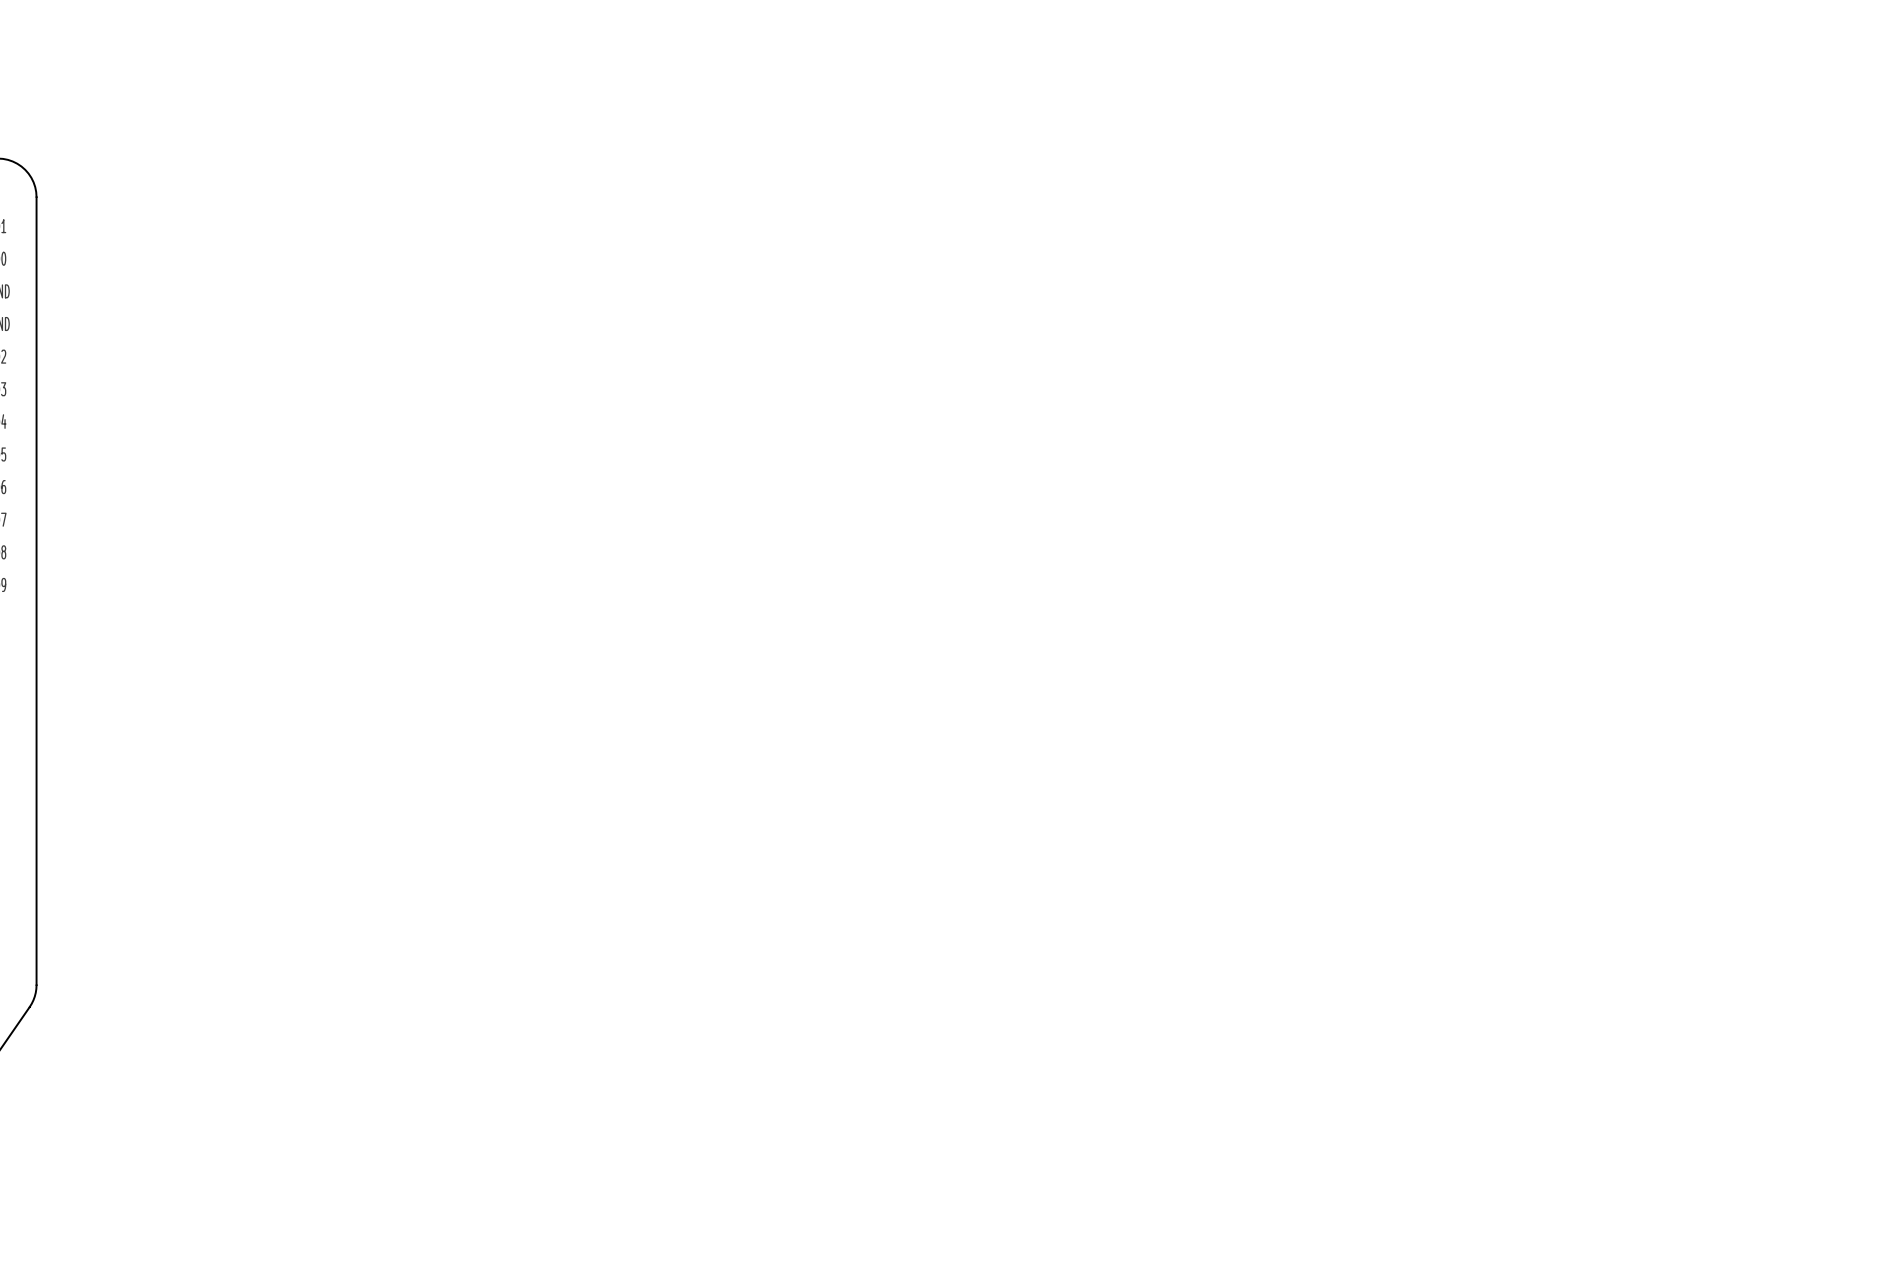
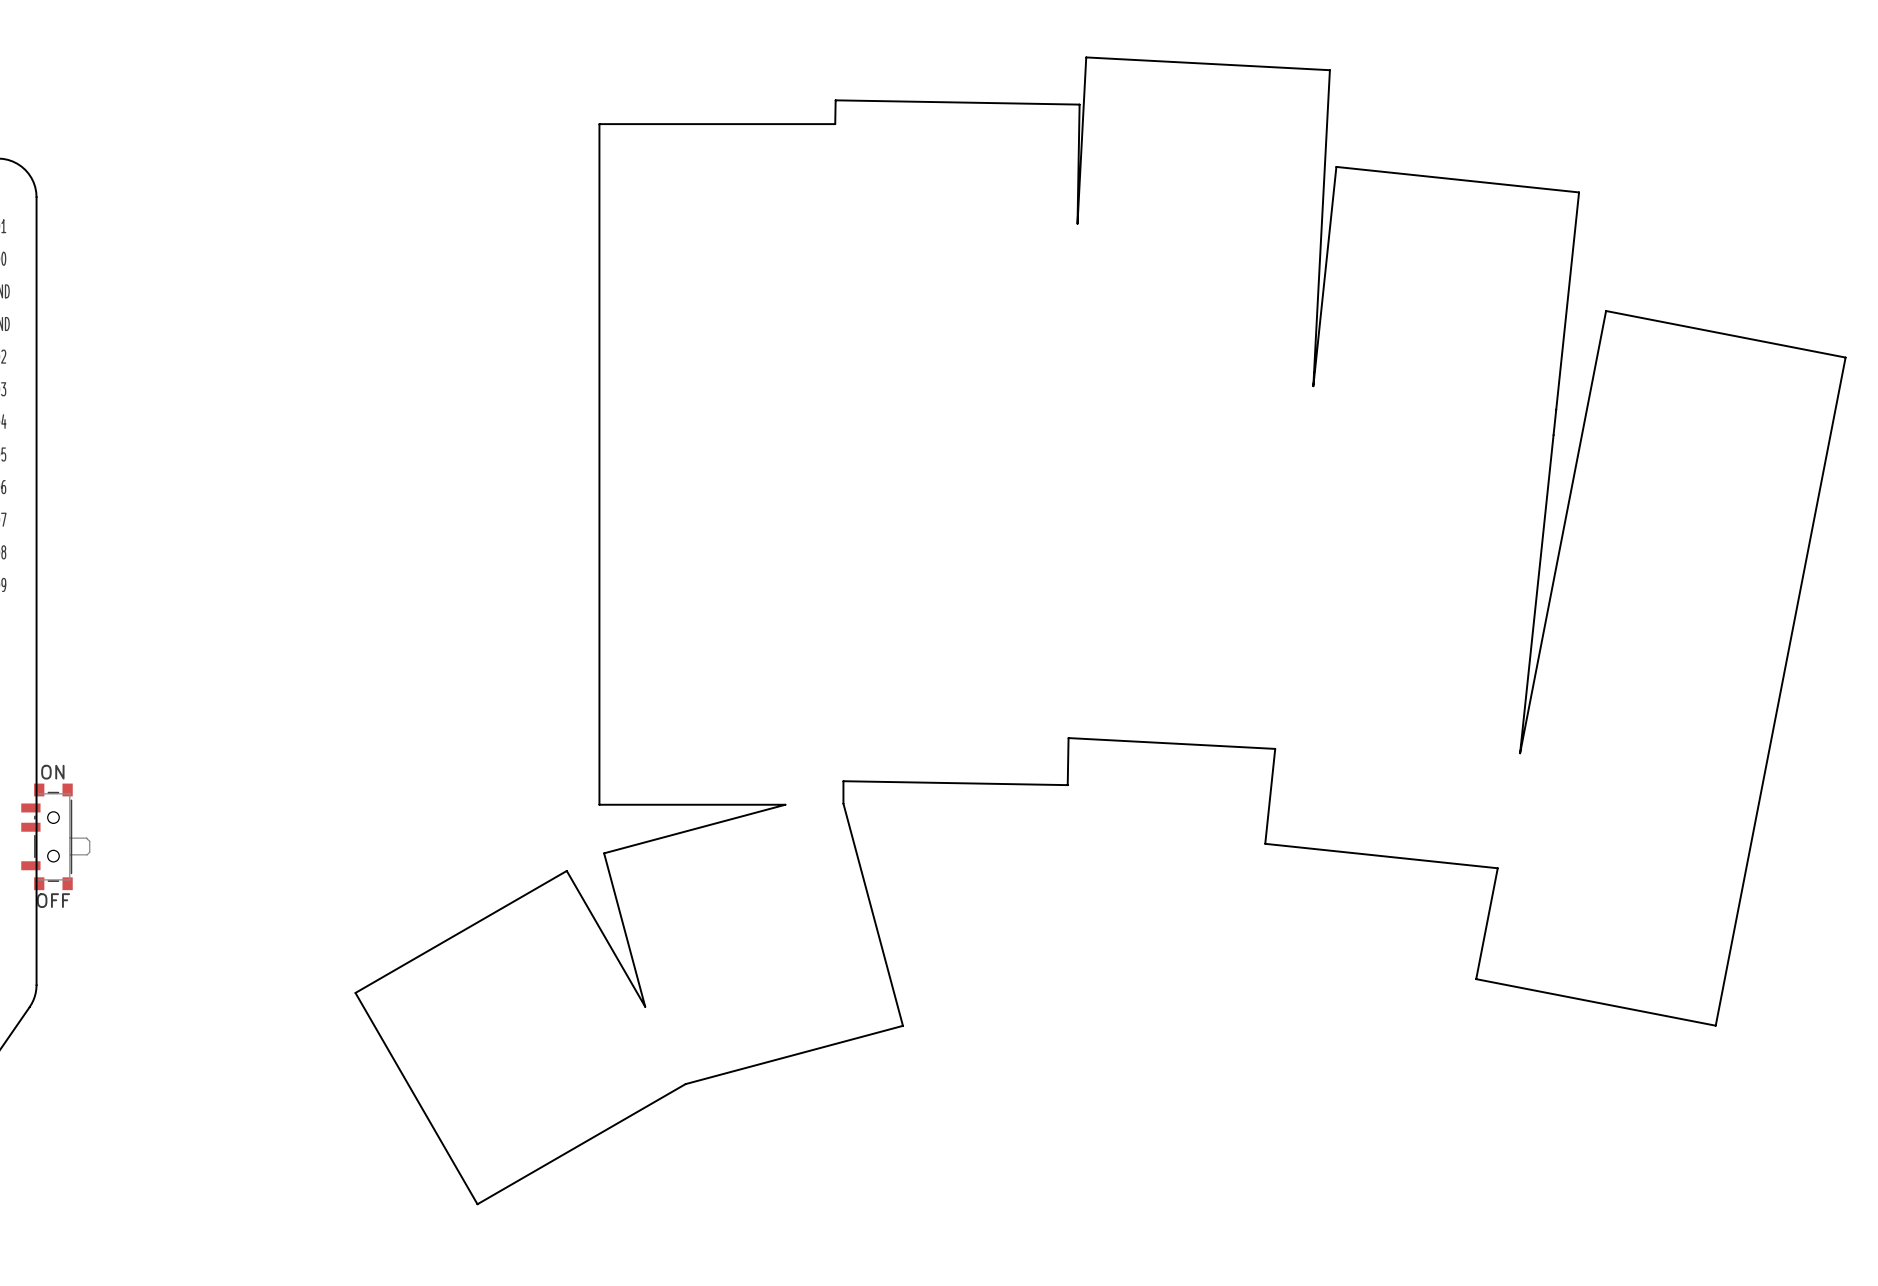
board edge: none -> (1086, 57) (1329, 70) (1313, 386) (1336, 166) (1579, 192) (1520, 753) (1606, 311) (1845, 357) (1715, 1025) (1476, 979) (1497, 868) (1265, 843) (1275, 748) (1068, 738) (1067, 785) (843, 781) (843, 803) (902, 1025) (685, 1084) (477, 1204) (355, 992) (566, 870) (645, 1006) (604, 853) (785, 804) (599, 804) (599, 124) (835, 124) (835, 100) (1079, 104) (1077, 223) (1086, 57)
part: none -> (55, 836)

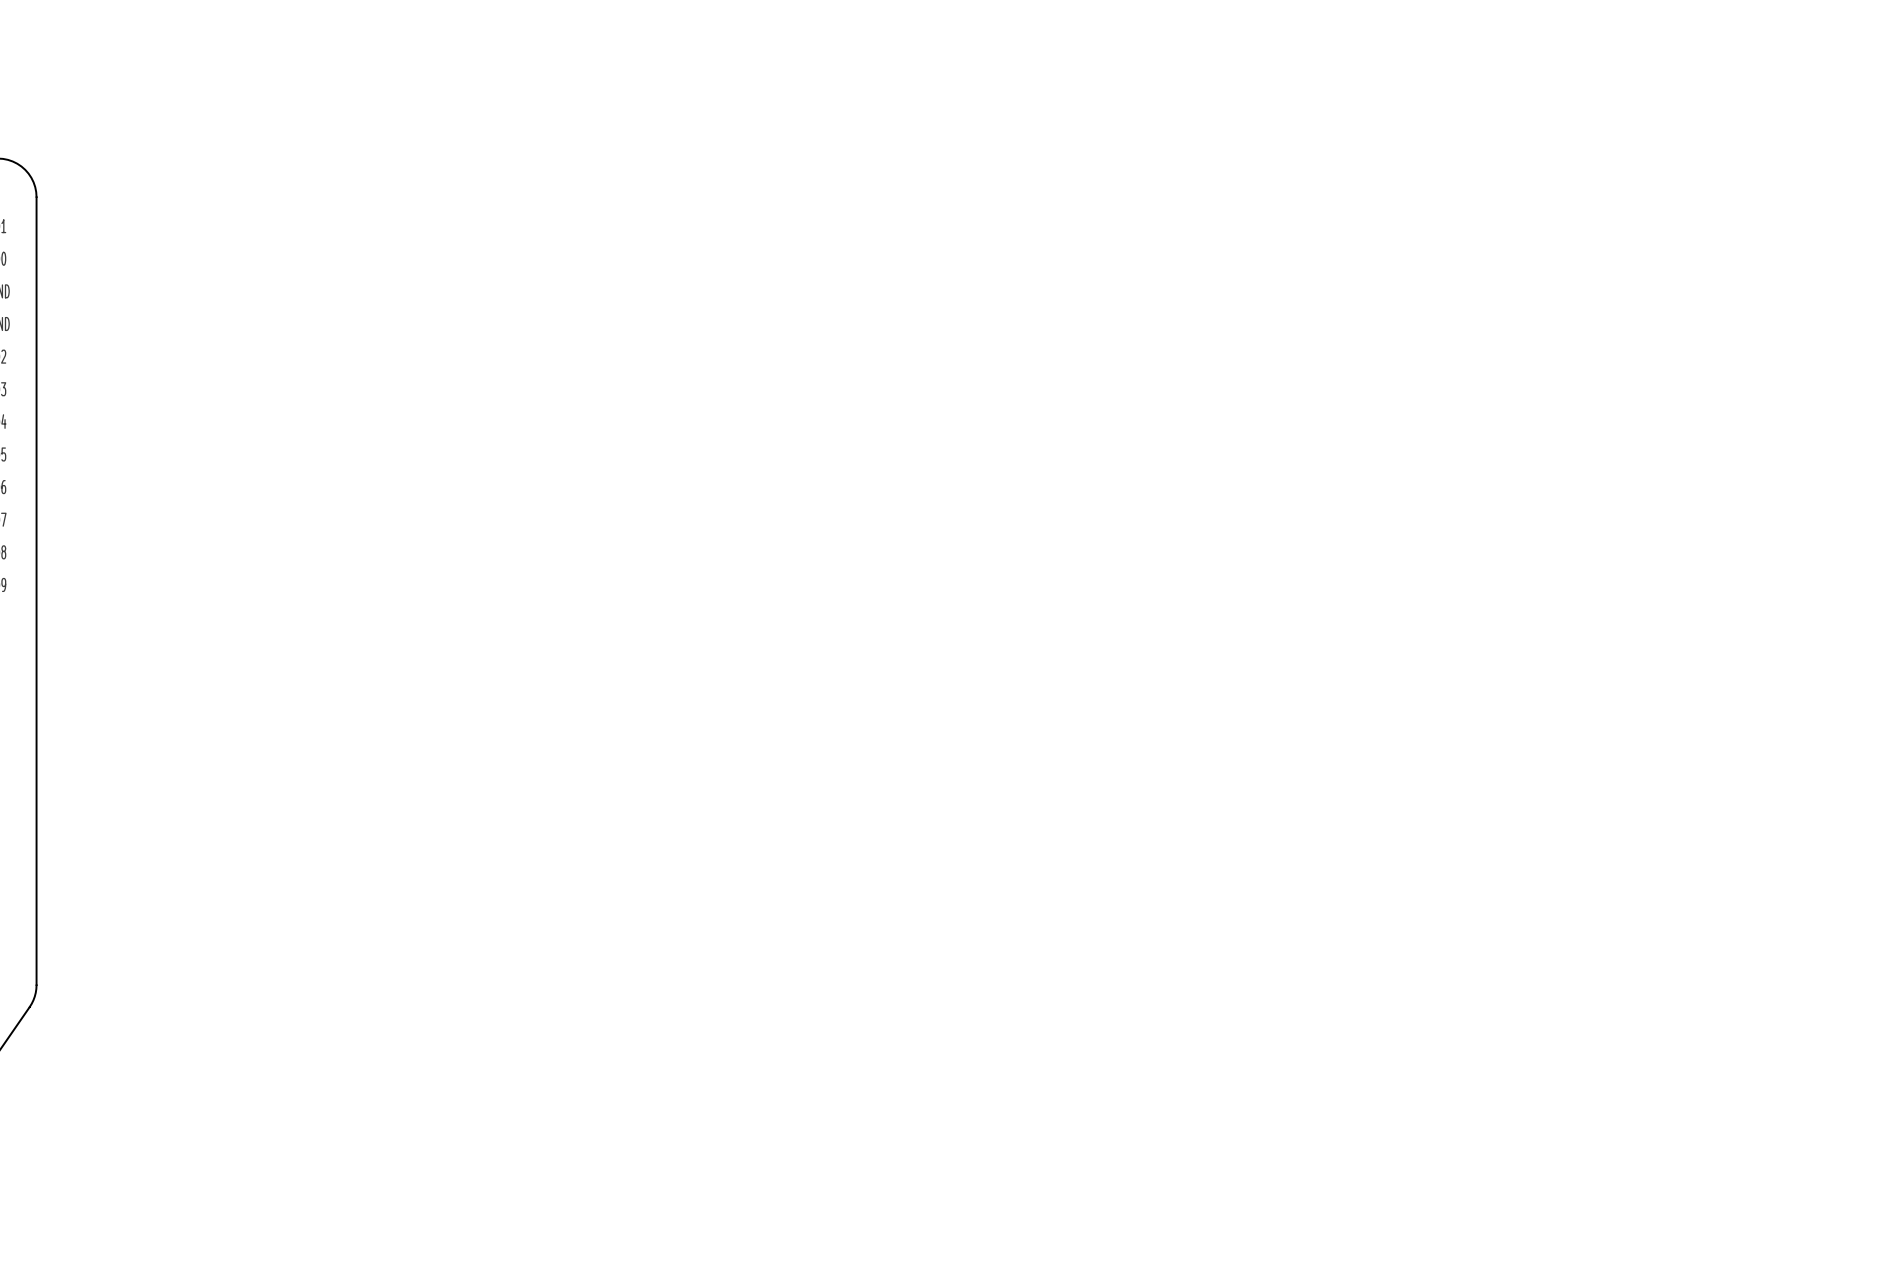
board edge: (1086, 57) (1329, 70) (1313, 386) (1336, 166) (1579, 192) (1520, 753) (1606, 311) (1845, 357) (1715, 1025) (1476, 979) (1497, 868) (1265, 843) (1275, 748) (1068, 738) (1067, 785) (843, 781) (843, 803) (902, 1025) (685, 1084) (477, 1204) (355, 992) (566, 870) (645, 1006) (604, 853) (785, 804) (599, 804) (599, 124) (835, 124) (835, 100) (1079, 104) (1077, 223) (1086, 57) -> none
part: (55, 836) -> none

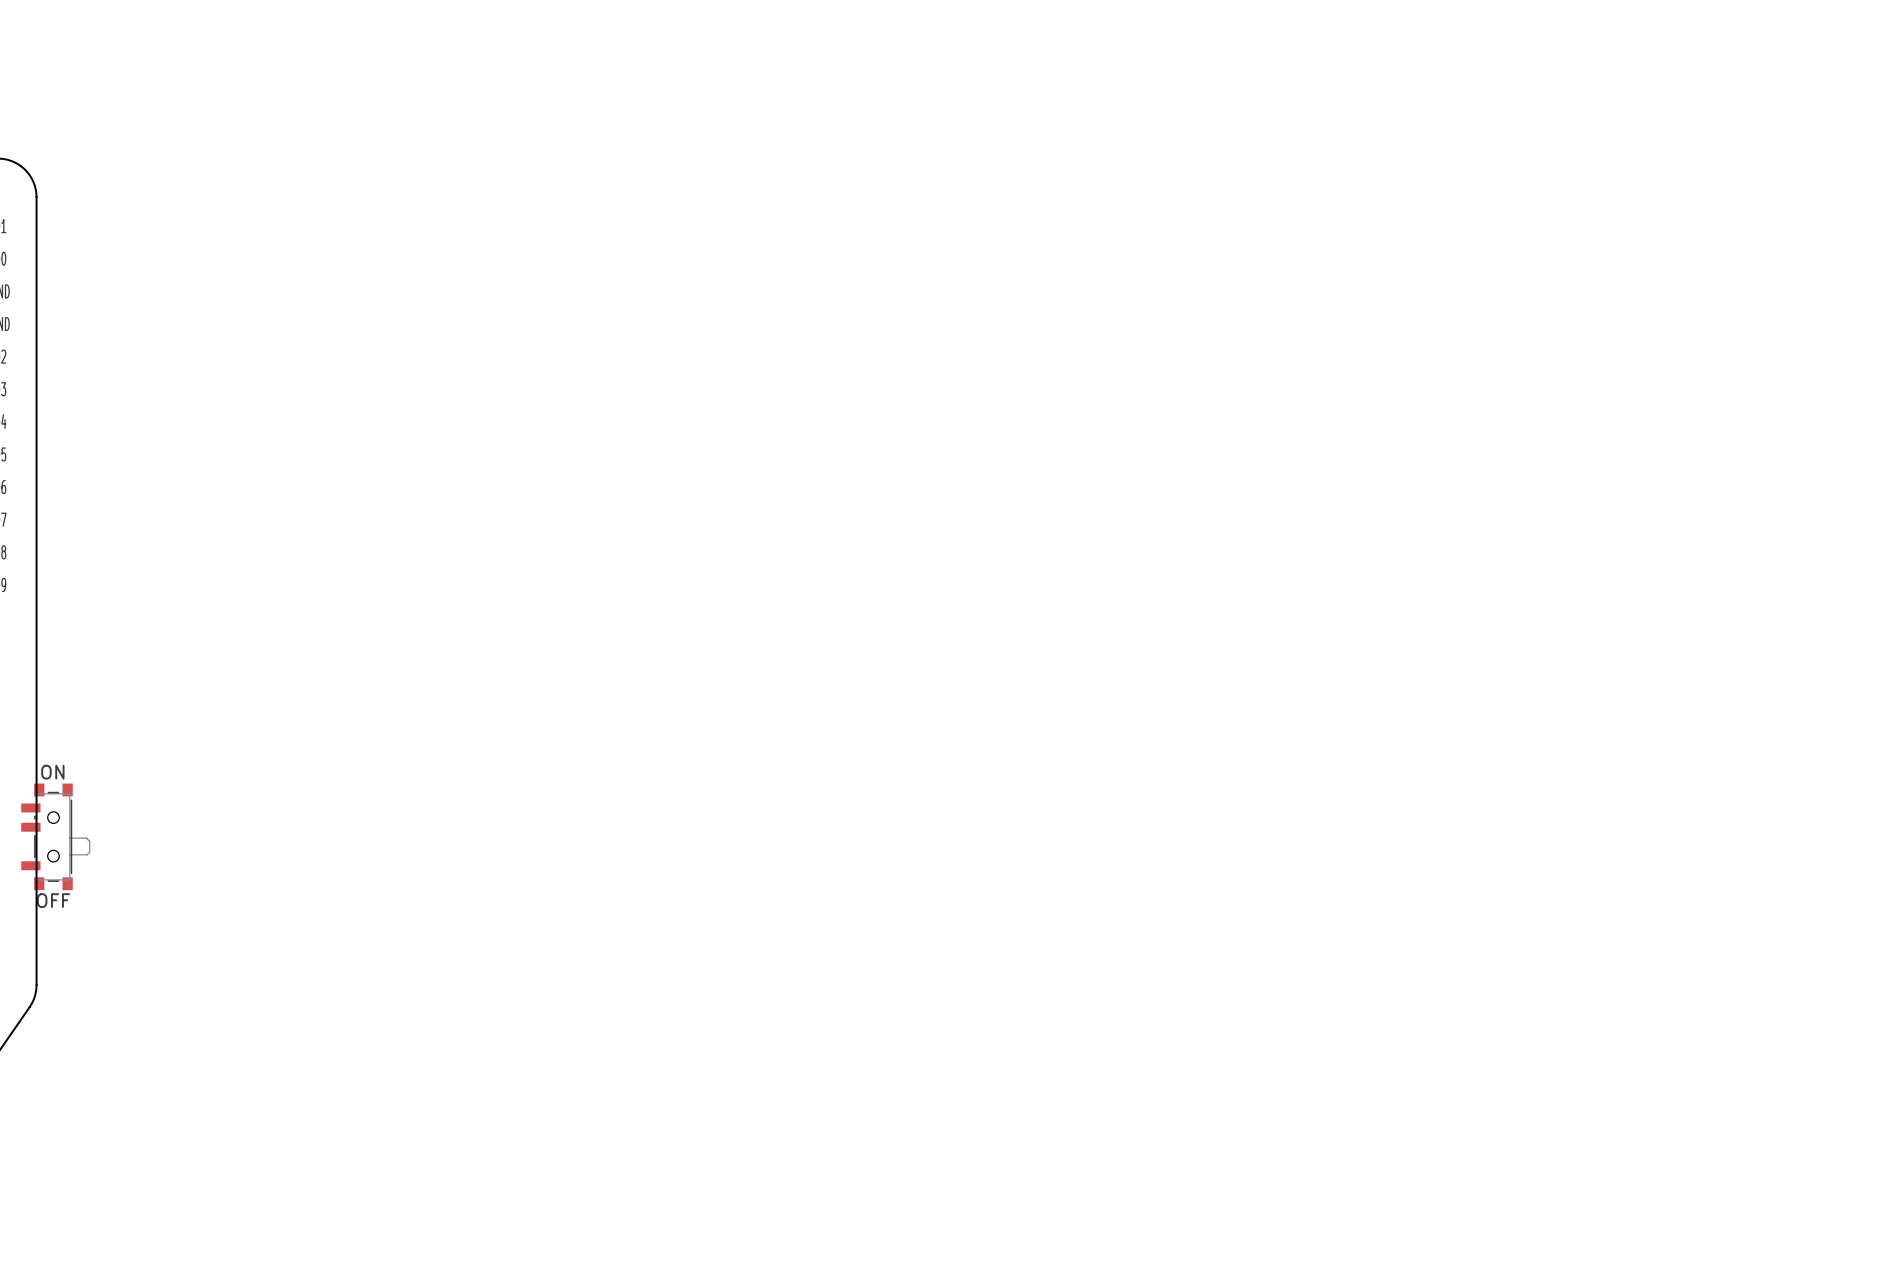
part: none -> (55, 836)

